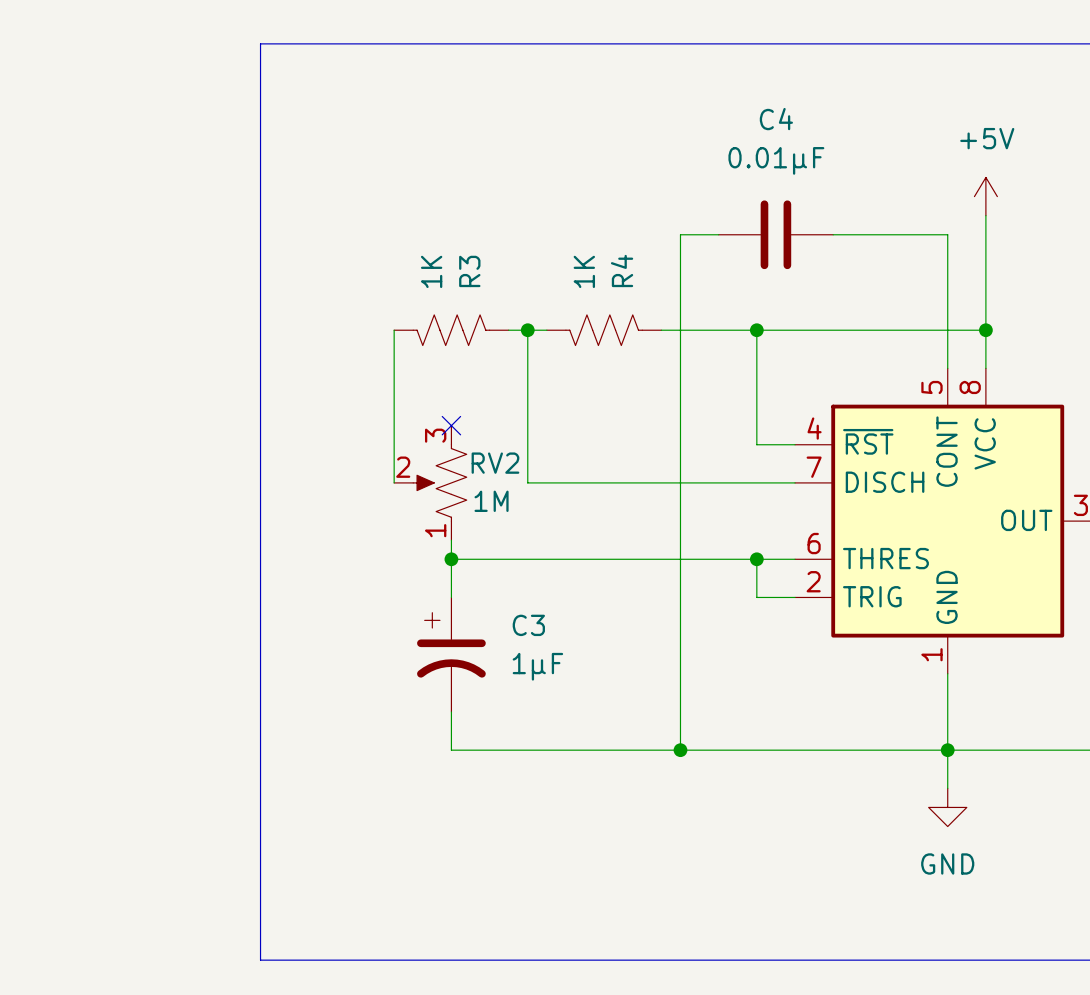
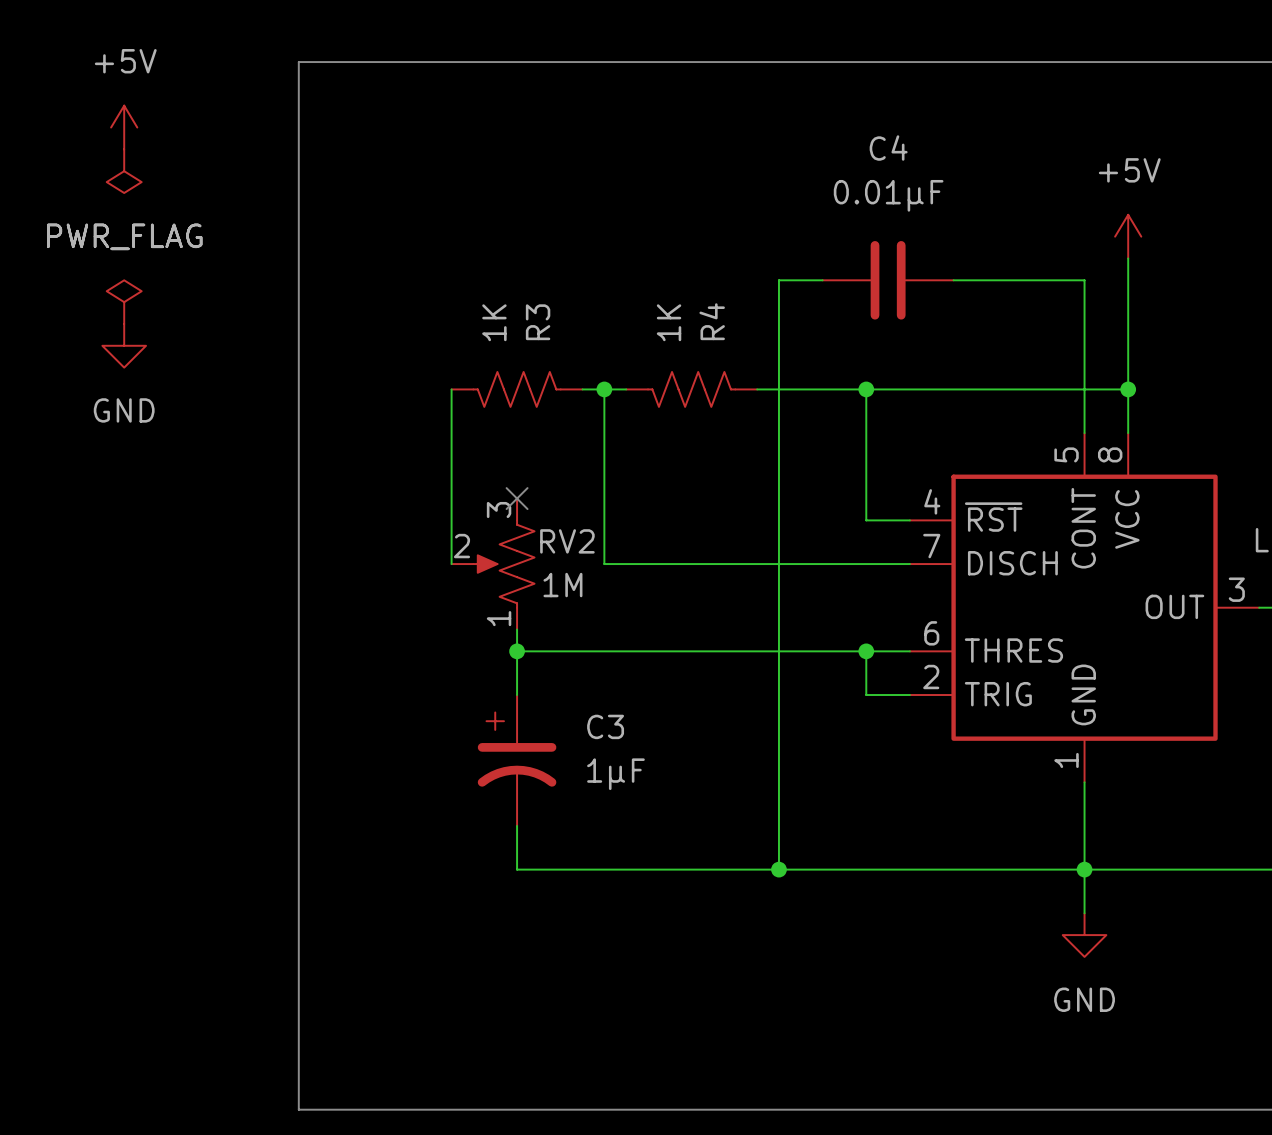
power symbol: none -> +5V (124, 127)
power symbol: none -> PWR_FLAG (124, 171)
power symbol: none -> PWR_FLAG (124, 302)
power symbol: none -> GND (124, 345)

